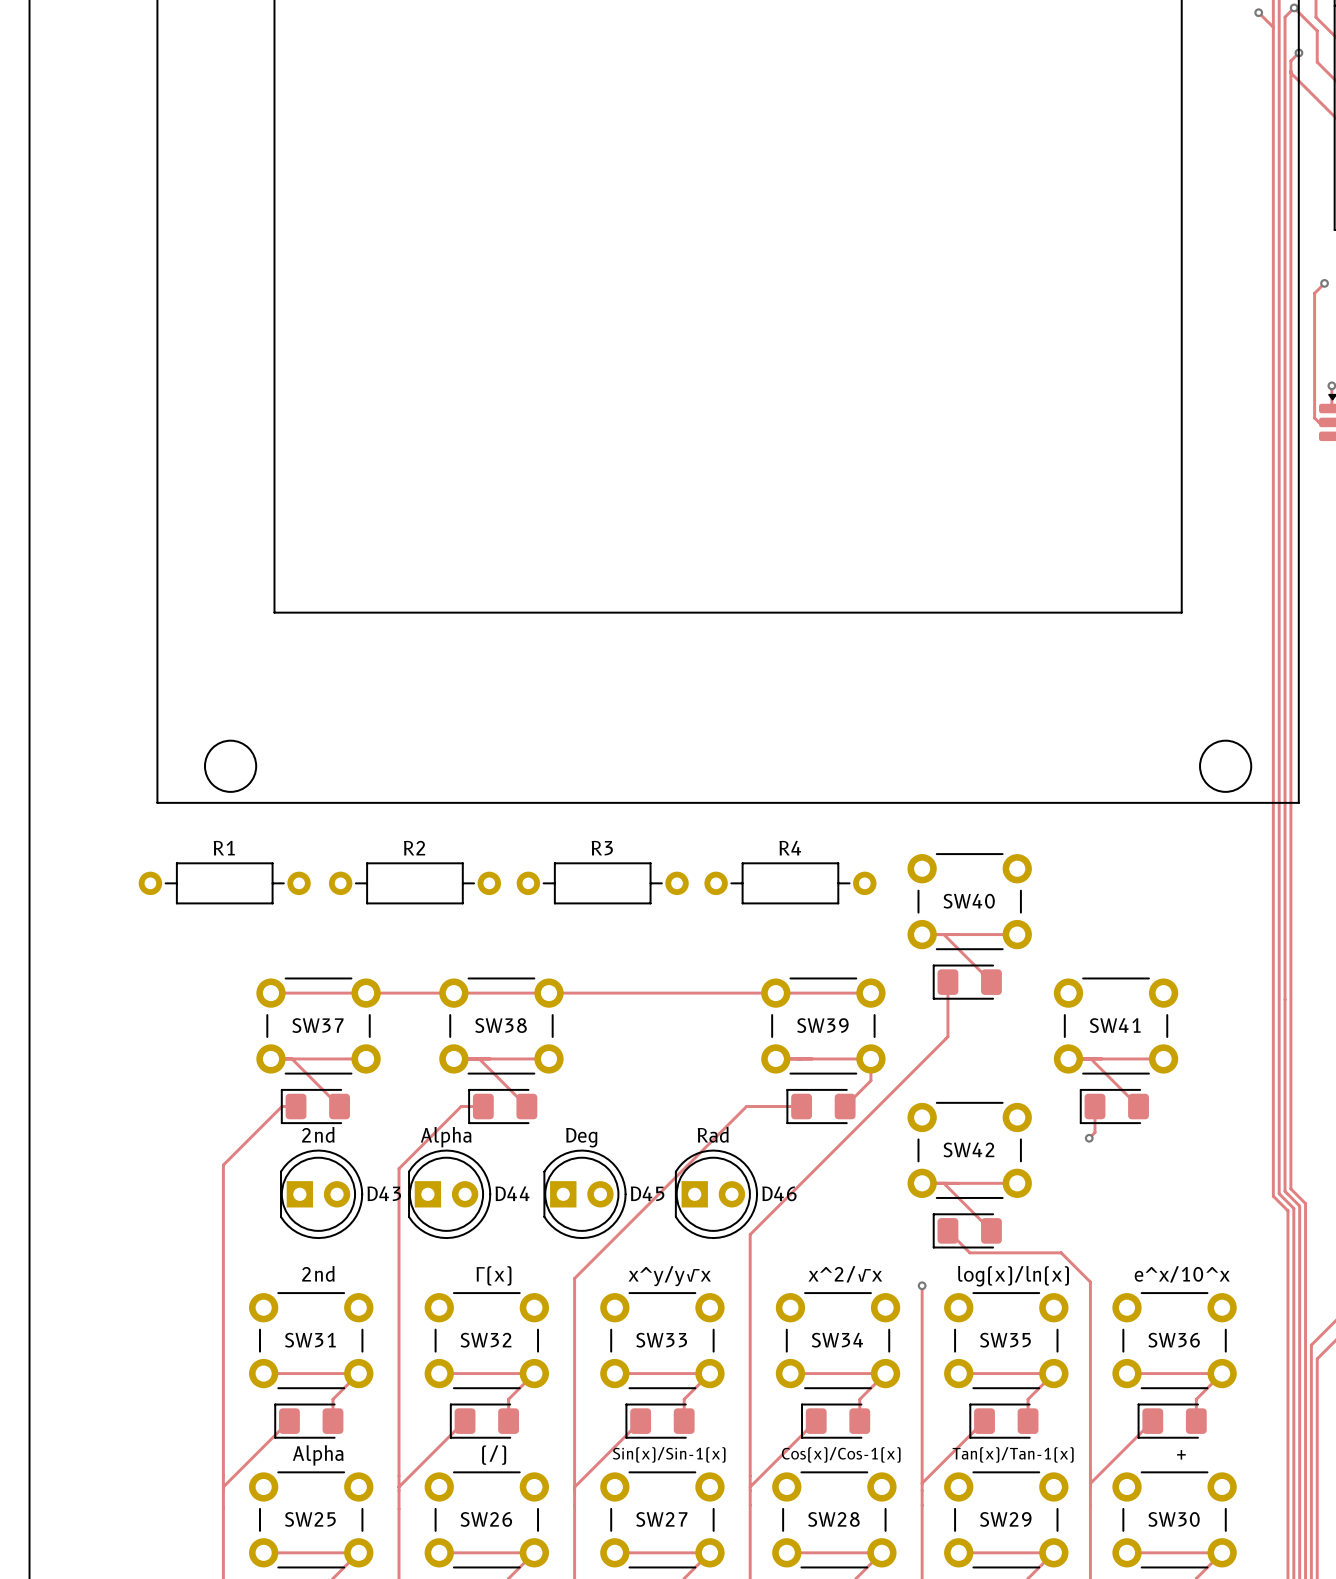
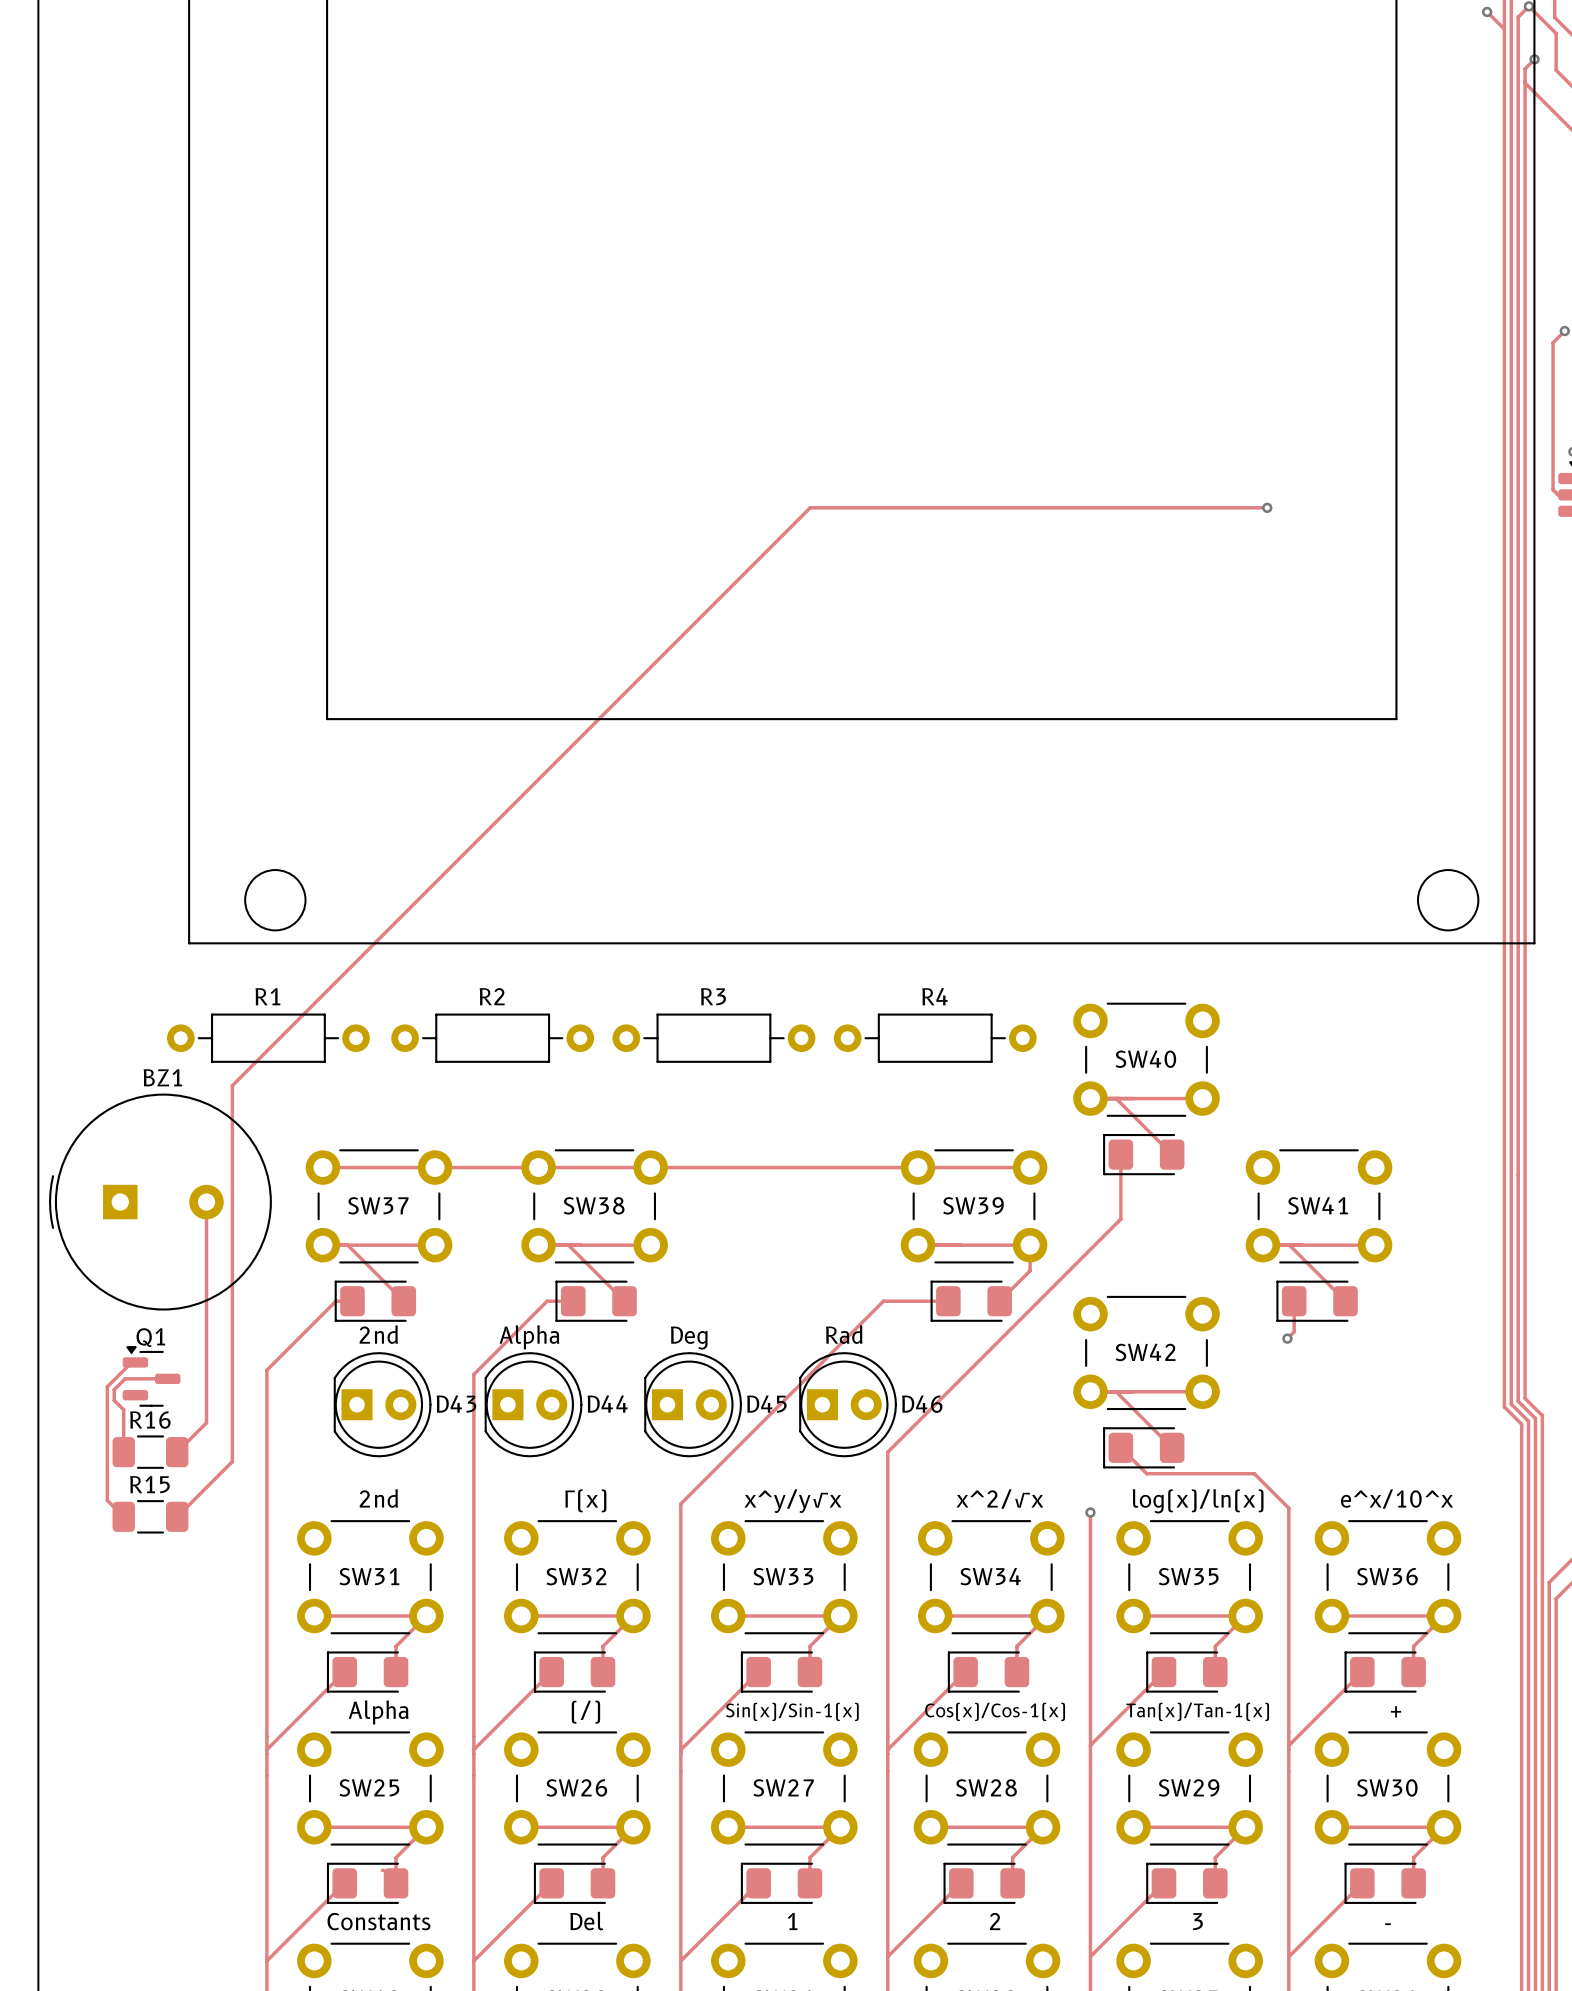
track: none -> (1267, 507) (810, 507) (232, 1085) (232, 1461) (177, 1516)
via: none -> (1267, 507)
BZ1: none -> (160, 1202)
track: none -> (206, 1202) (206, 1422) (177, 1452)
track: none -> (135, 1362) (131, 1362) (107, 1386) (107, 1500) (123, 1516)
Q1: none -> (151, 1376)
track: none -> (167, 1378) (125, 1378) (114, 1389) (114, 1400) (123, 1409) (123, 1452)
R16: none -> (150, 1452)
R15: none -> (150, 1516)

